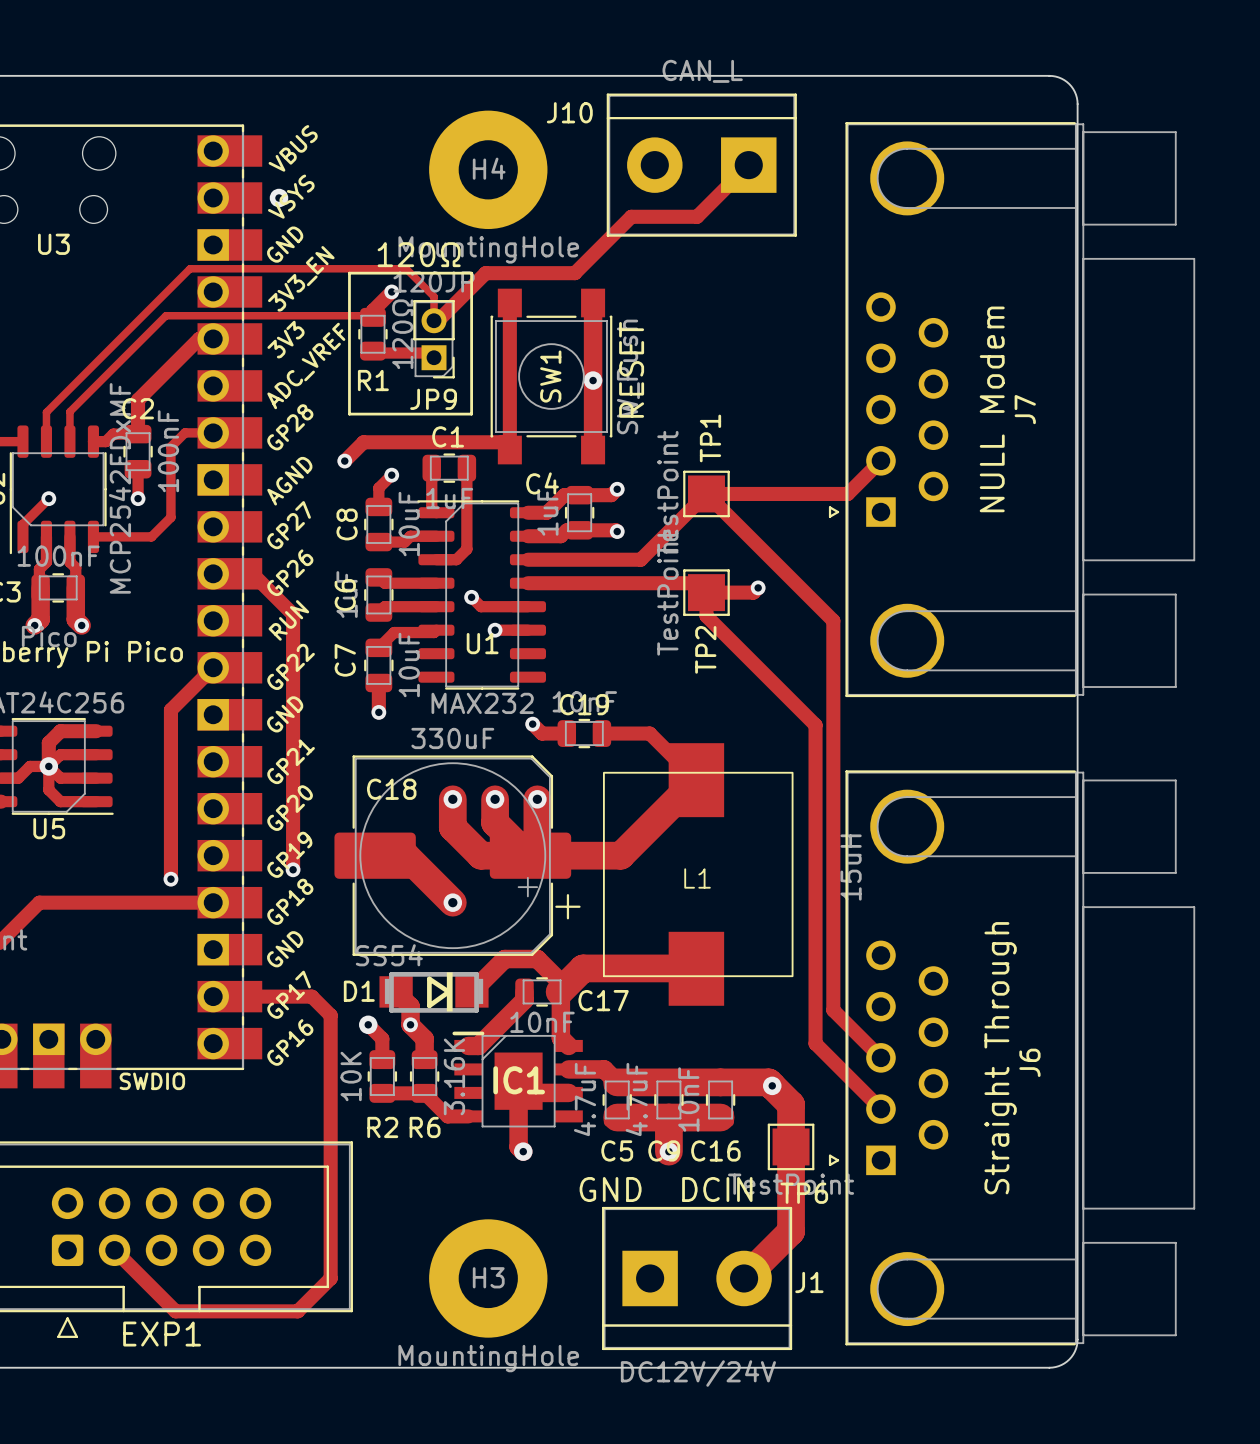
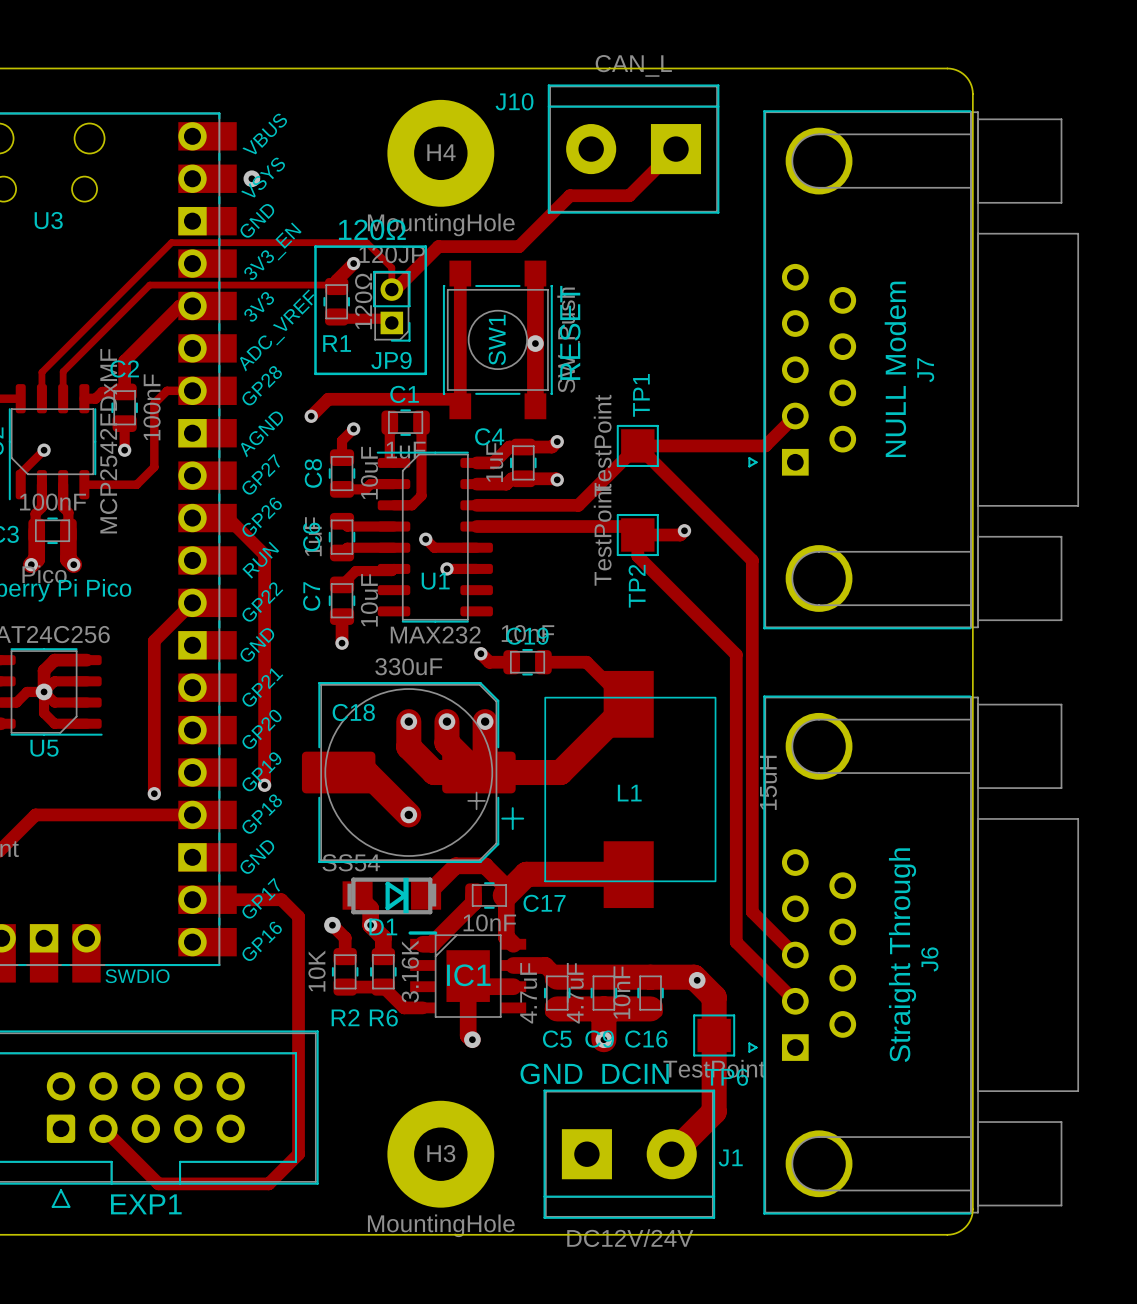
D1 name position: D1 (359, 991) -> D1 (383, 926)

